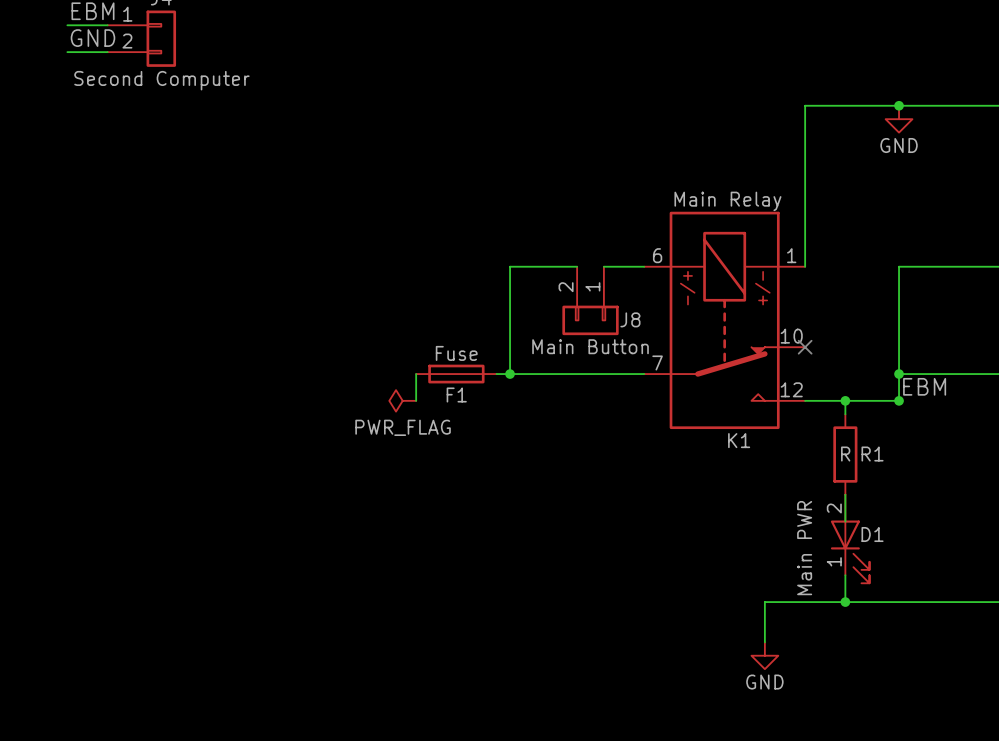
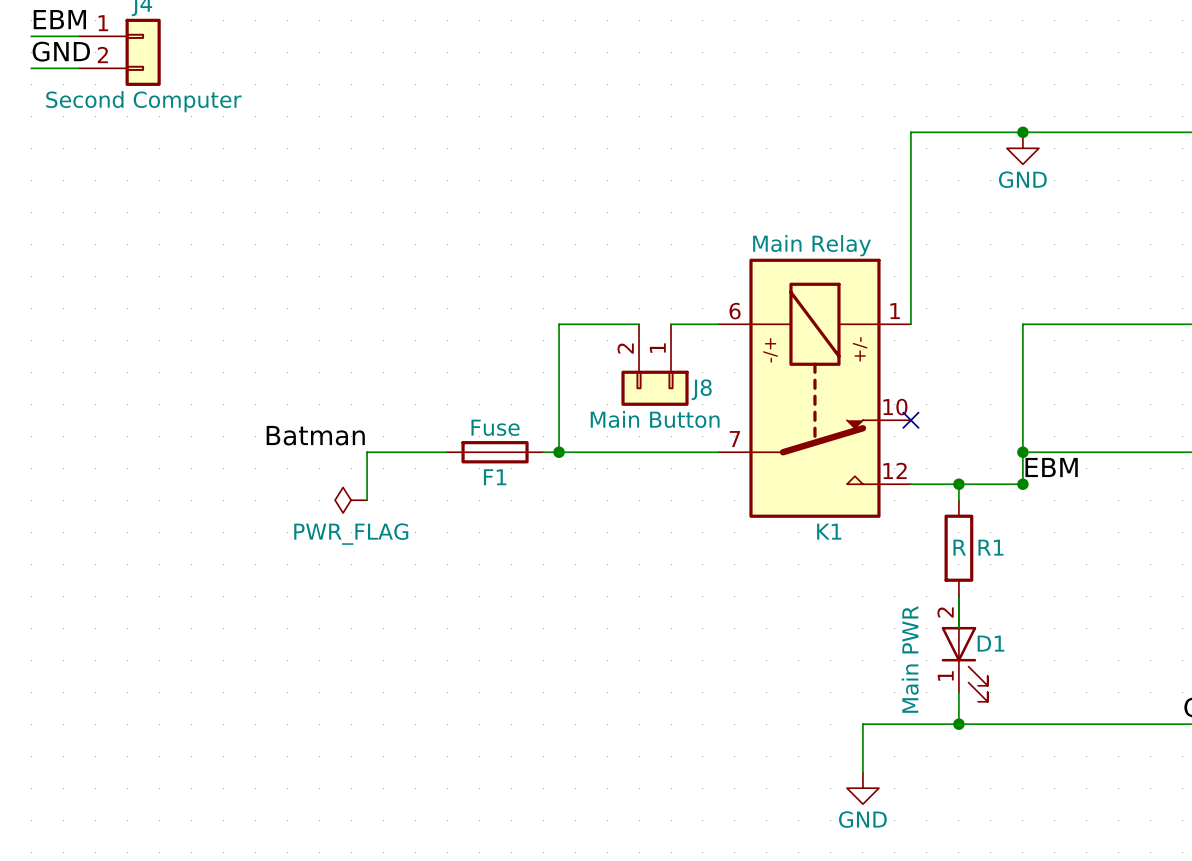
label: none -> Batman (315, 435)
wire: (416, 374) (416, 400) -> (447, 452) (367, 452) (367, 500)
power symbol position: PWR_FLAG (402, 400) -> PWR_FLAG (351, 500)

